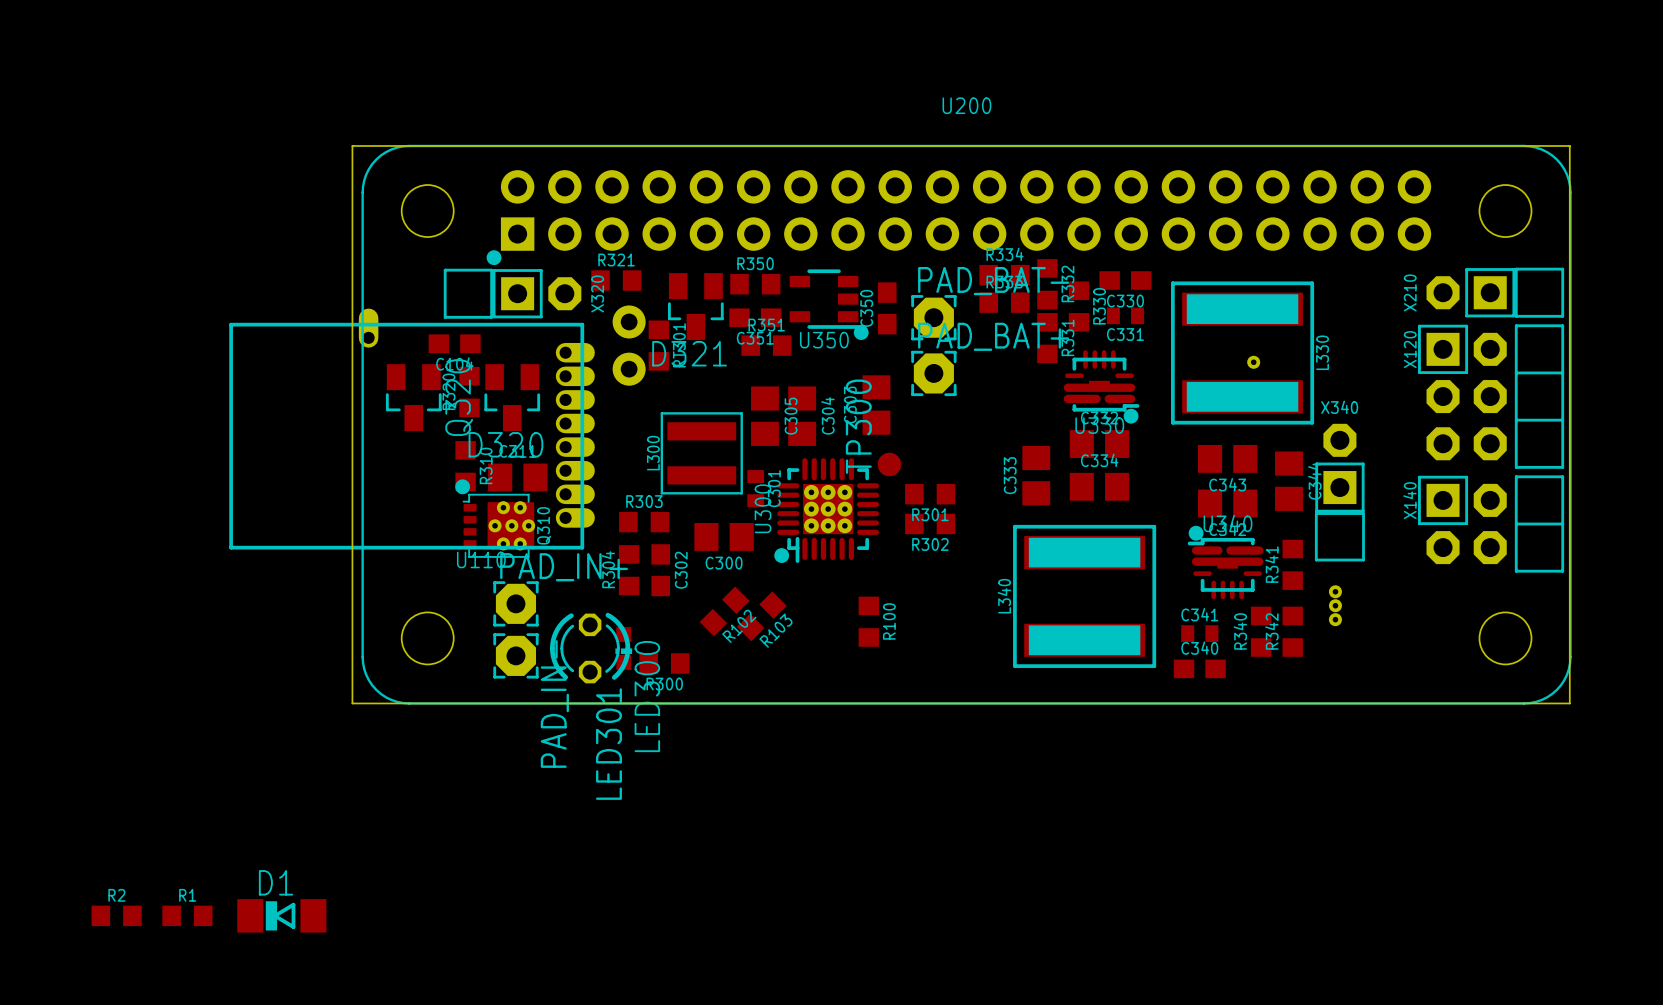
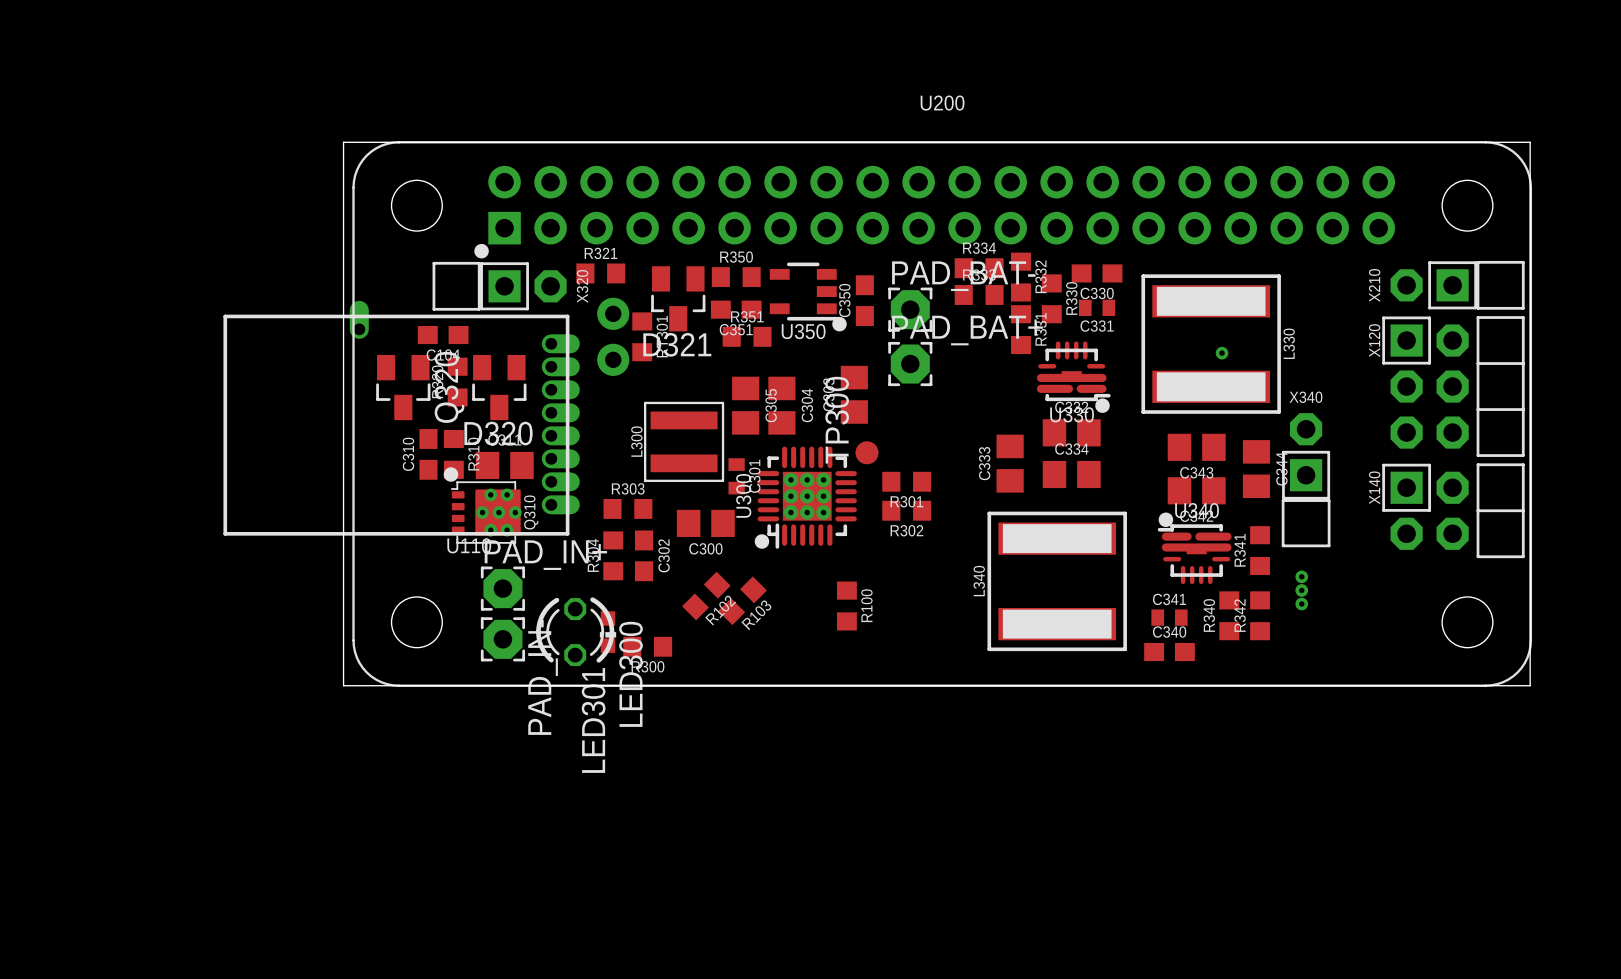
C310: none -> (428, 454)
R2: (116, 915) -> none
R1: (187, 915) -> none
D1: (281, 915) -> none

